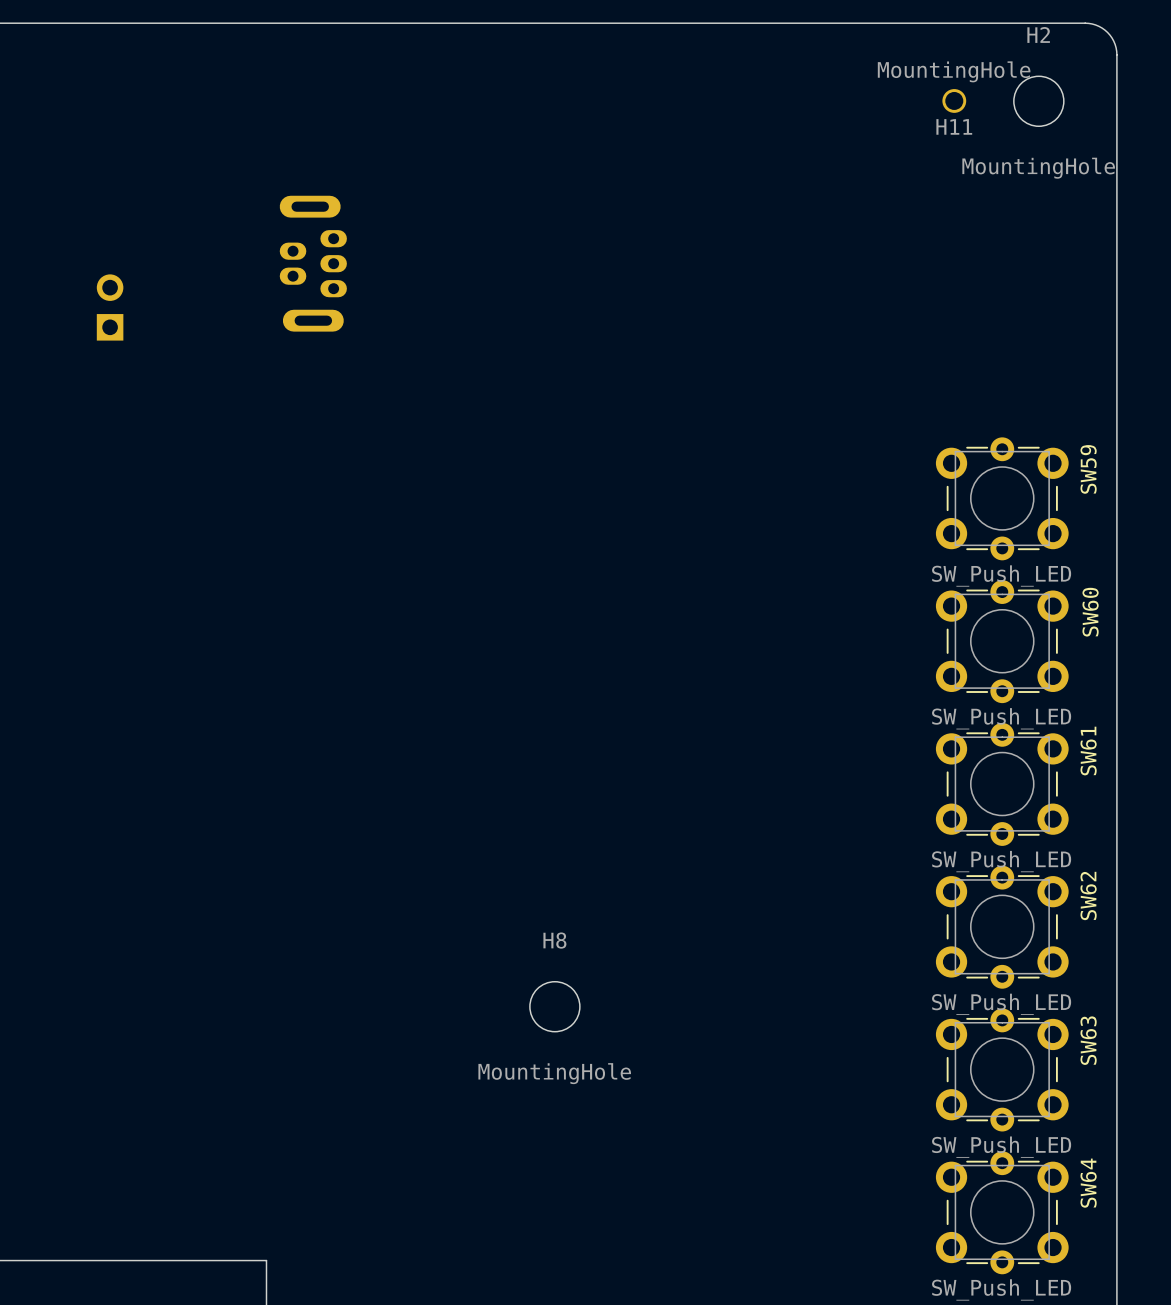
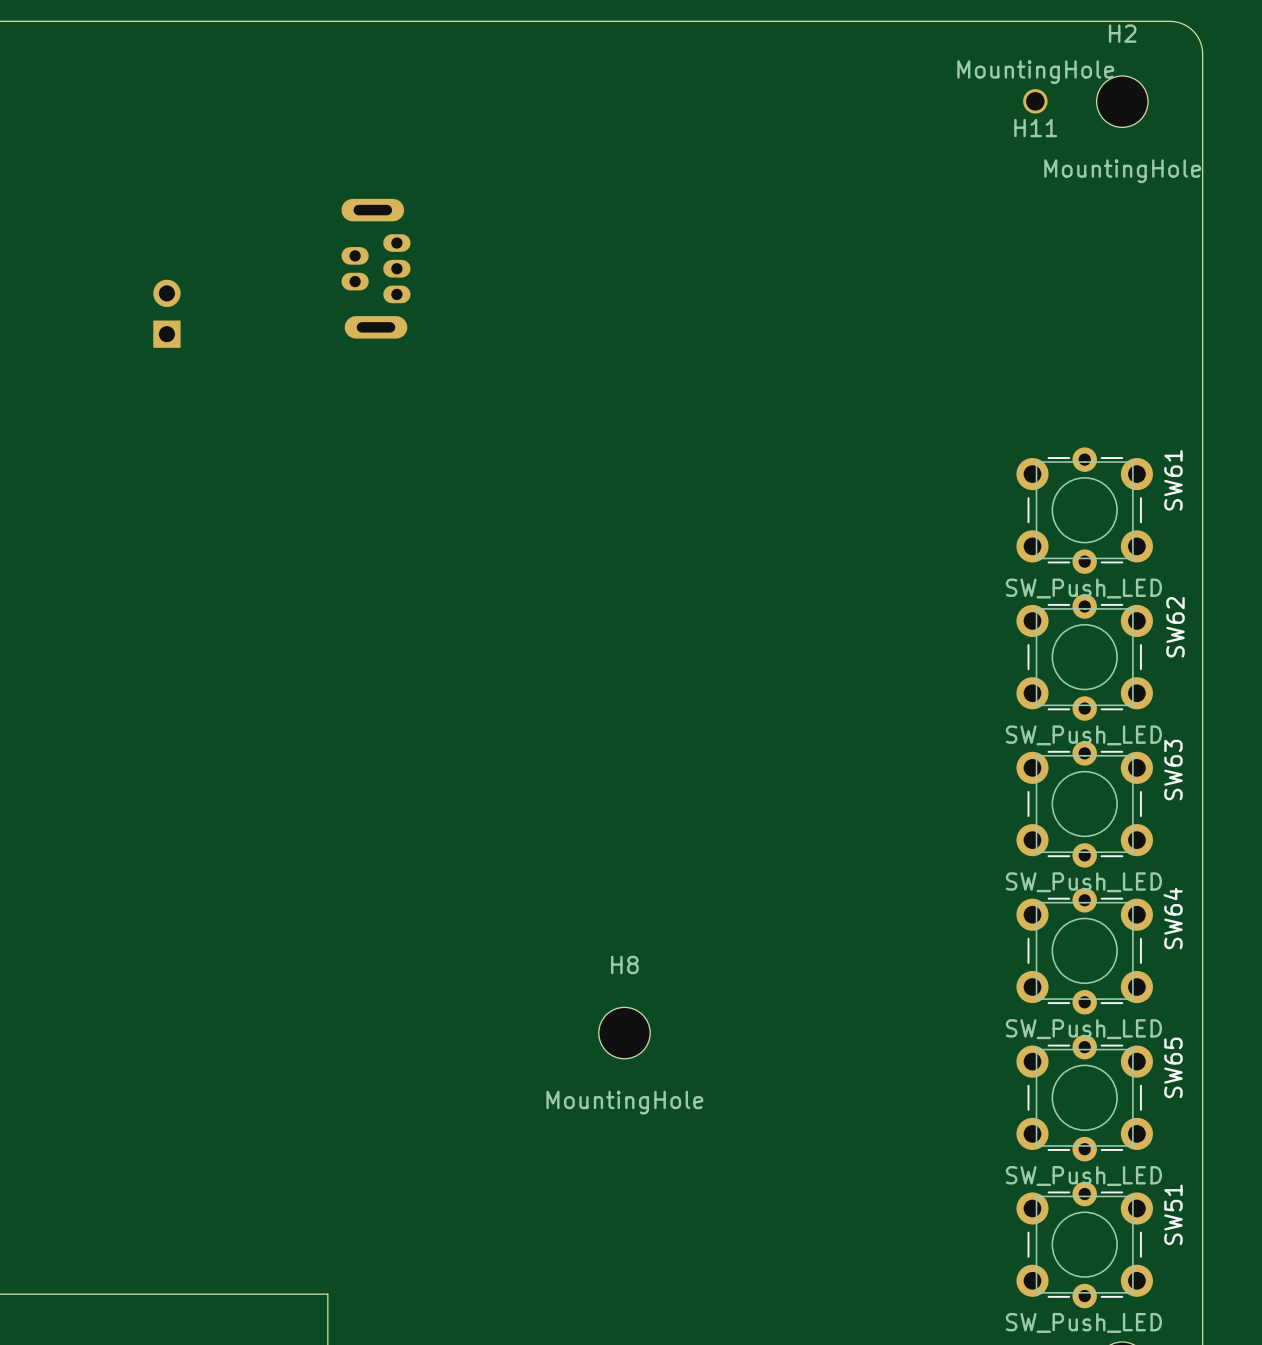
SW59 name: SW59 (1088, 469) -> SW61 (1173, 480)
SW60 name: SW60 (1090, 612) -> SW62 (1175, 627)
SW61 name: SW61 (1088, 751) -> SW63 (1173, 770)
SW62 name: SW62 (1088, 895) -> SW64 (1173, 918)
SW63 name: SW63 (1088, 1040) -> SW65 (1173, 1067)
SW64 name: SW64 (1088, 1183) -> SW51 (1173, 1214)

